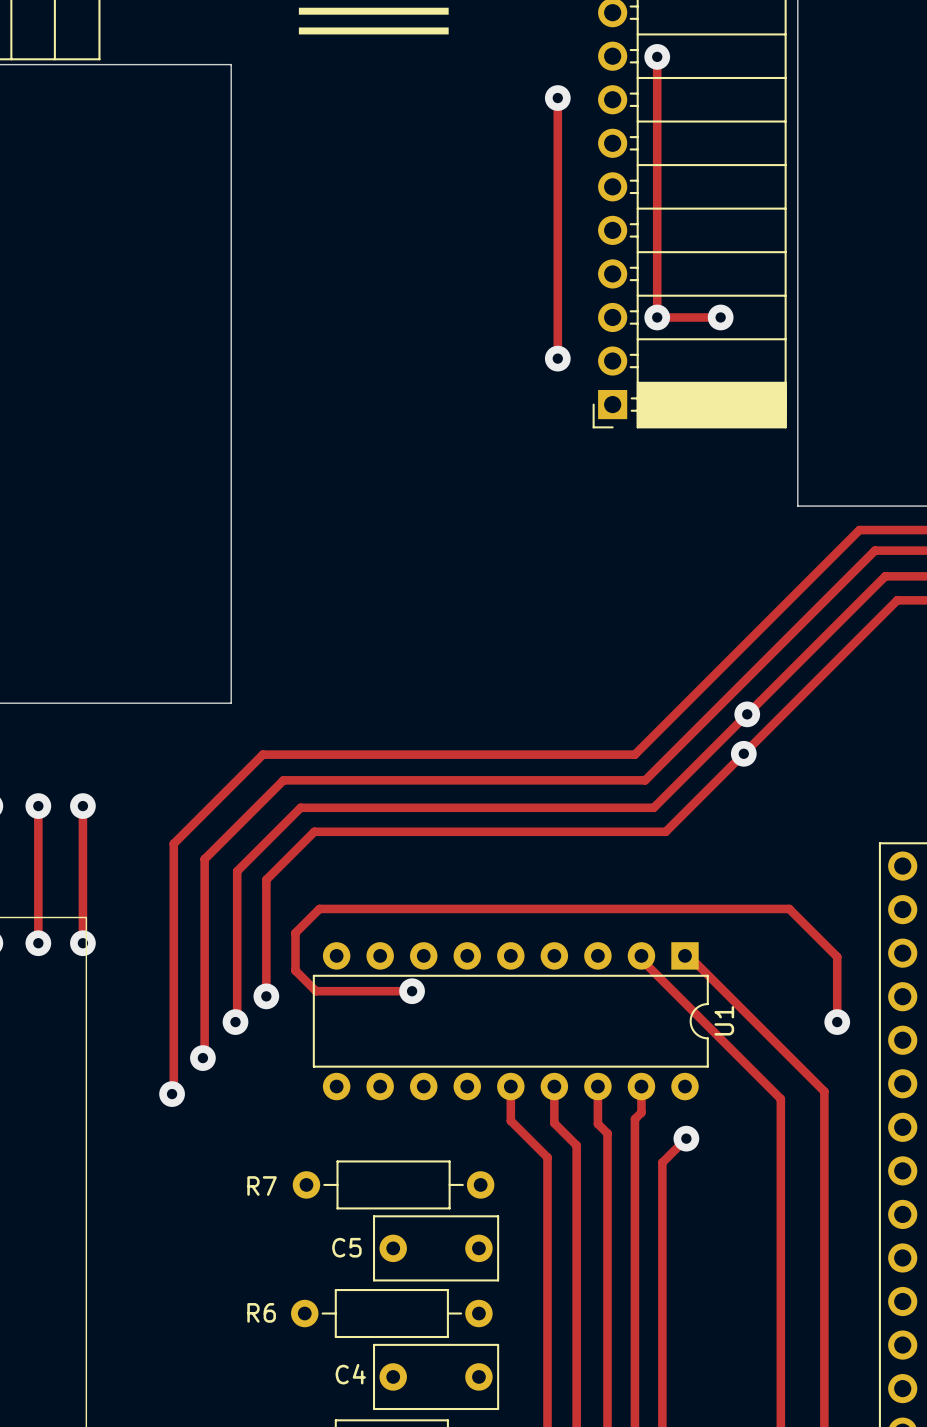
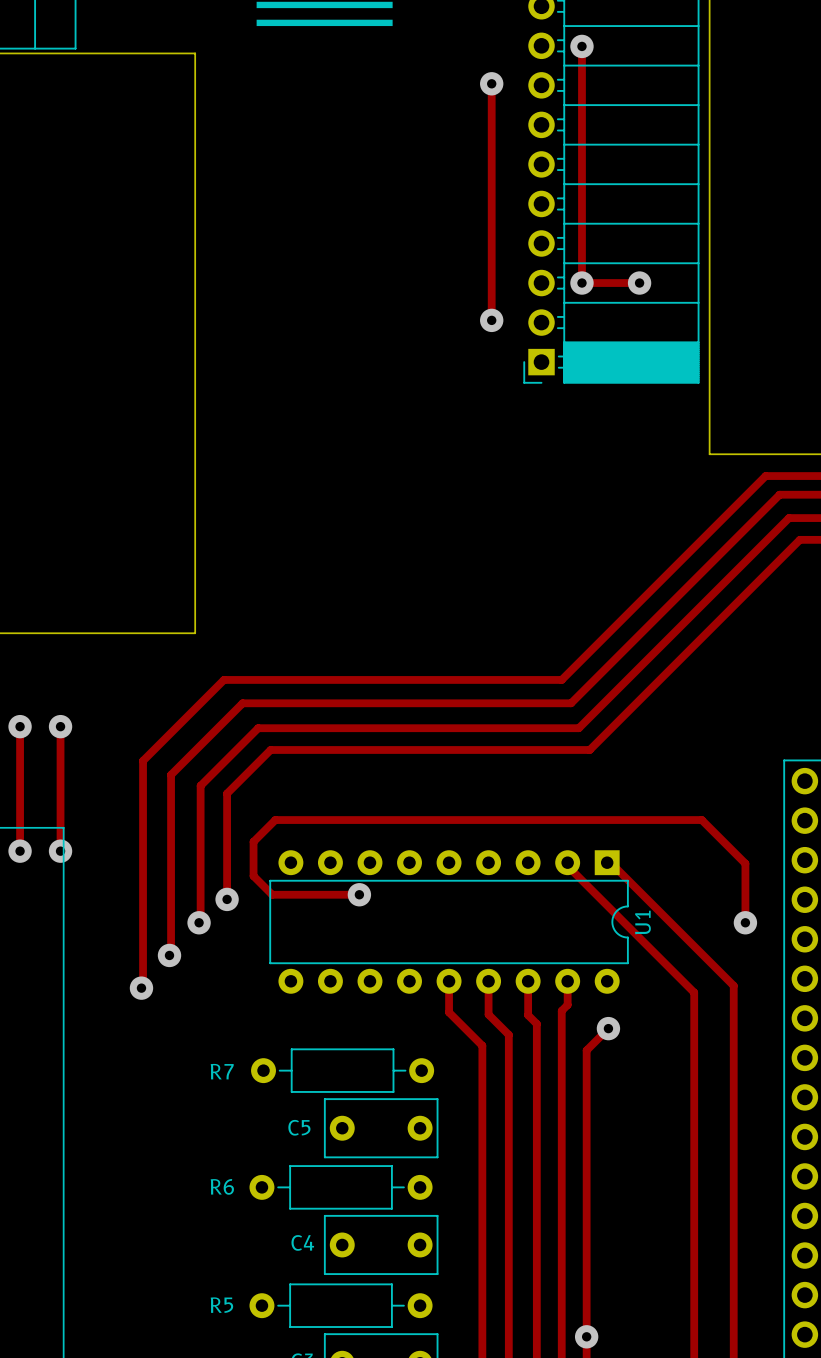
via: (747, 714) -> none
via: (743, 753) -> none

